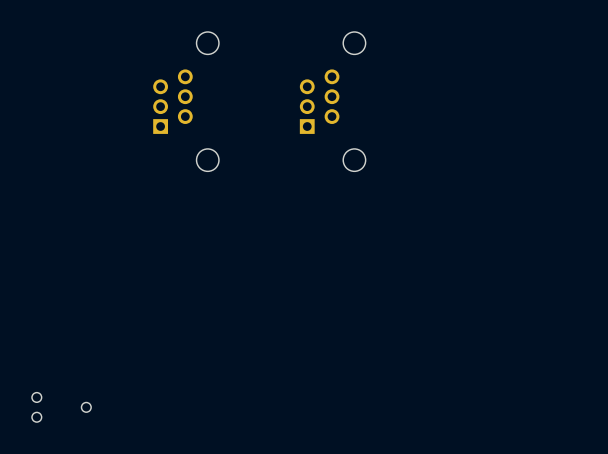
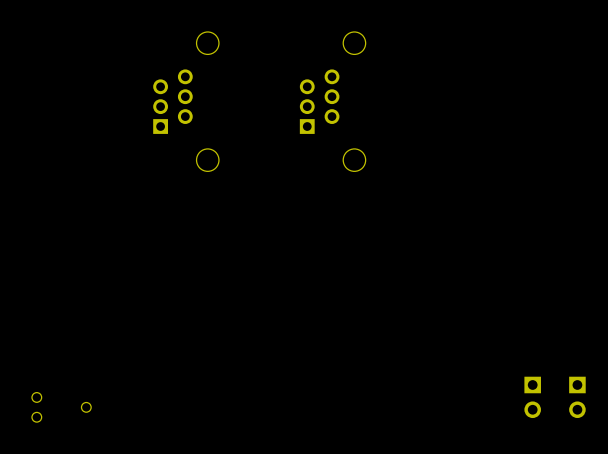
part: none -> (532, 397)
part: none -> (577, 397)

